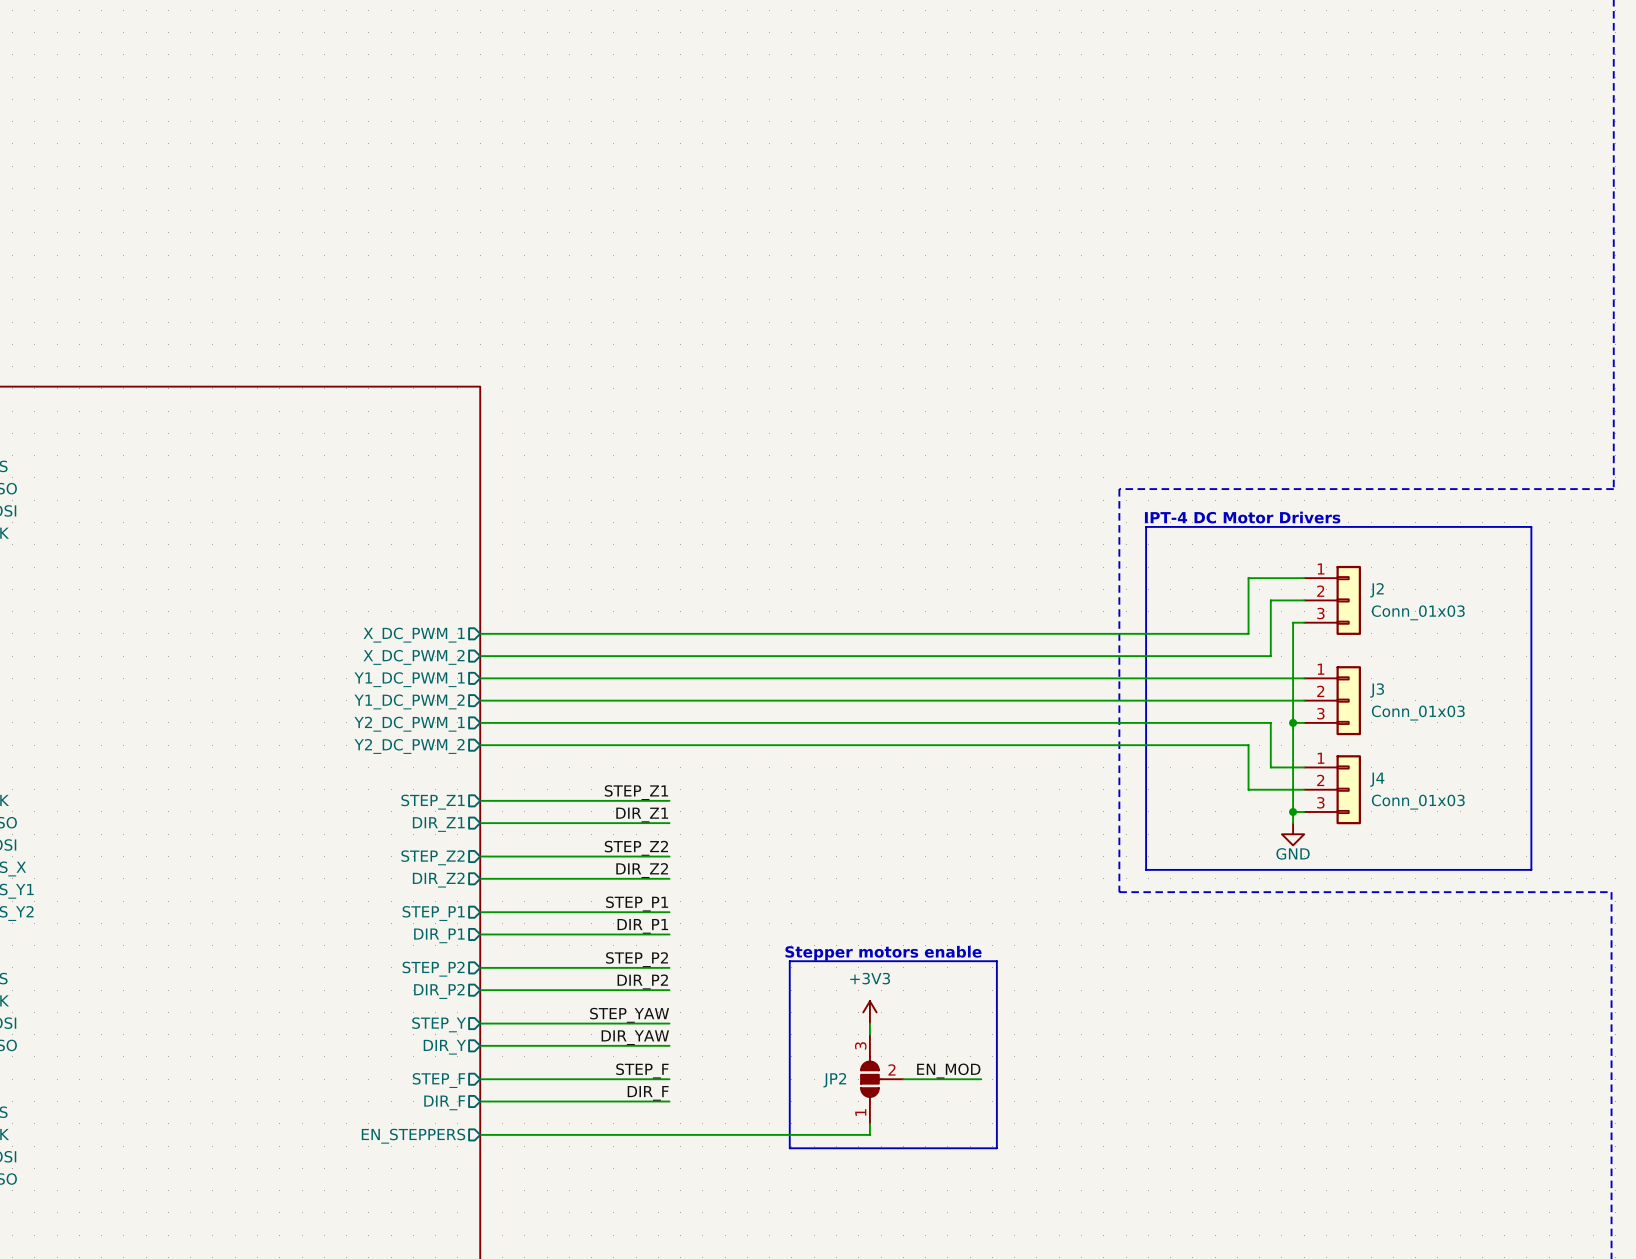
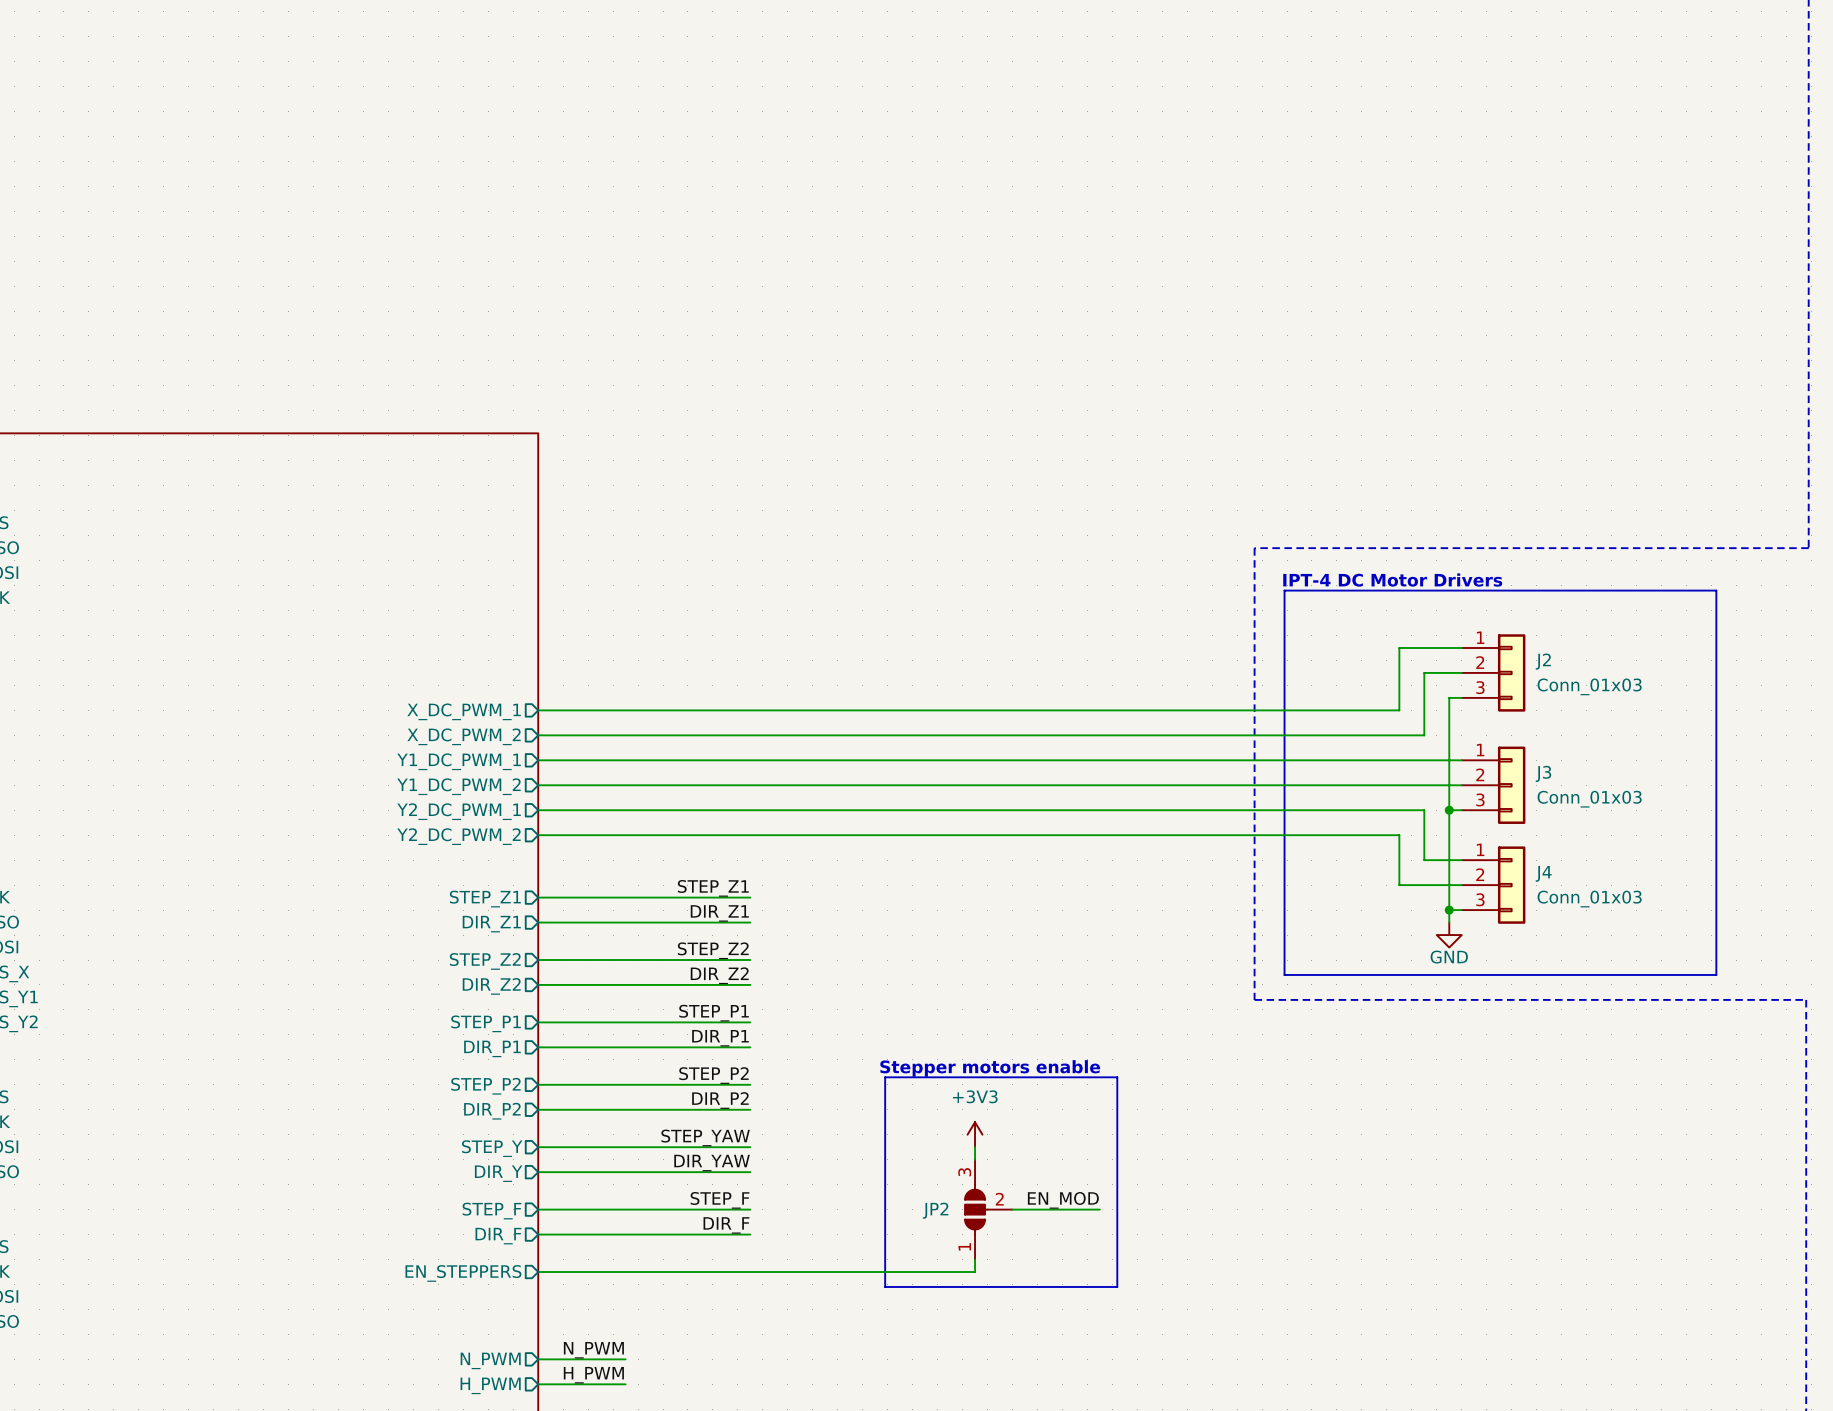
label: none -> N_PWM (593, 1350)
wire: none -> (538, 1359) (625, 1359)
sheet pin: none -> N_PWM (490, 1360)
label: none -> H_PWM (593, 1375)
wire: none -> (538, 1384) (625, 1384)
sheet pin: none -> H_PWM (490, 1385)

